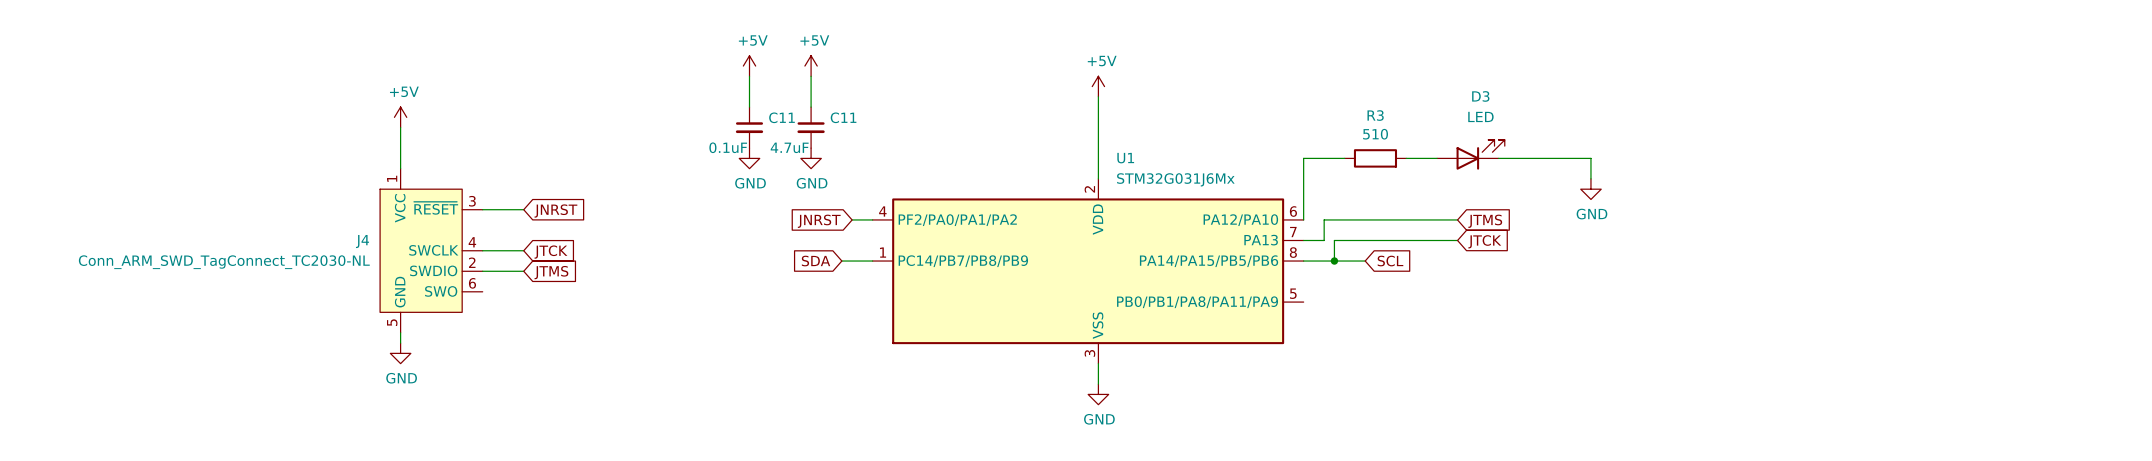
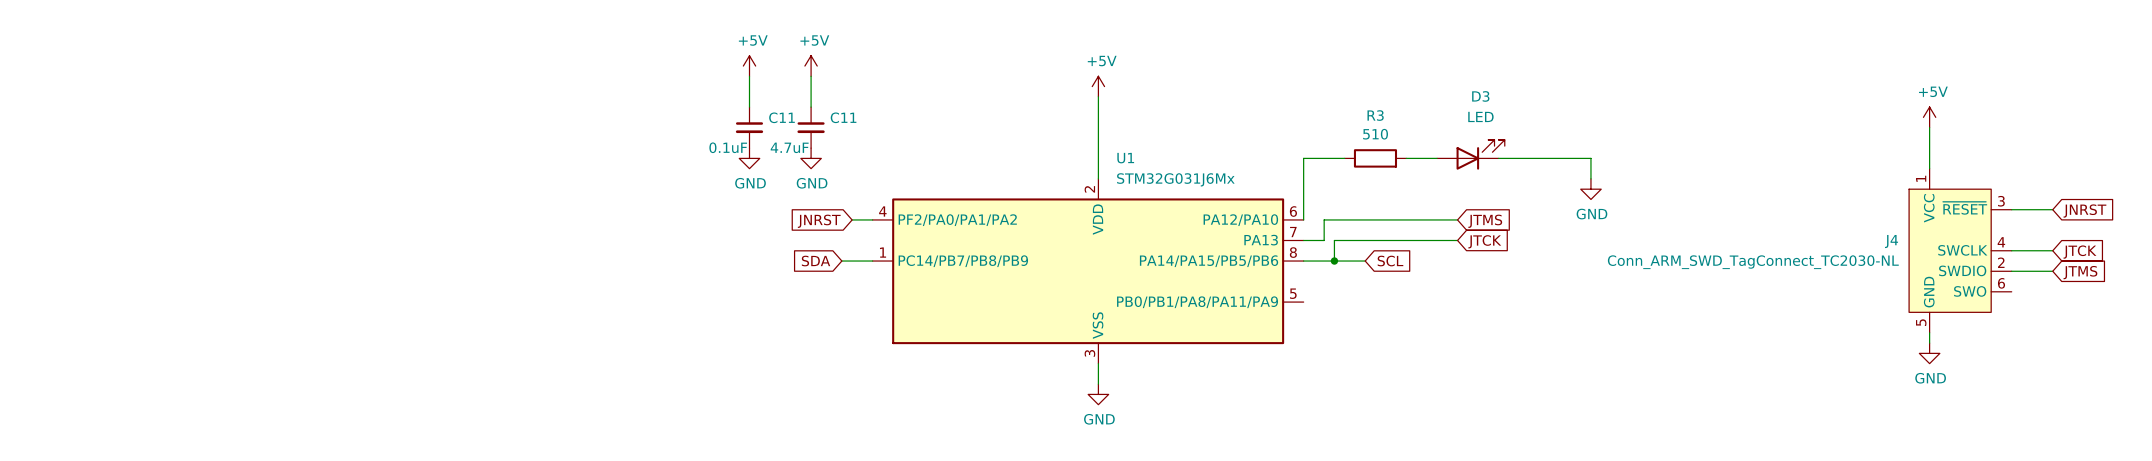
power symbol: +5V (400, 117) -> none
power symbol: none -> +5V (1929, 117)
wire: (400, 127) (400, 168) -> none
wire: none -> (1929, 127) (1929, 168)
wire: (482, 209) (523, 209) -> none
wire: none -> (2011, 209) (2052, 209)
global label: JNRST (555, 211) -> none
global label: none -> JNRST (2084, 211)
J4 position: (431, 250) -> (1960, 250)
wire: (482, 250) (523, 250) -> none
wire: none -> (2011, 250) (2052, 250)
global label: JTCK (550, 252) -> none
global label: none -> JTCK (2079, 252)
wire: (482, 271) (523, 271) -> none
wire: none -> (2011, 271) (2052, 271)
global label: JTMS (551, 272) -> none
global label: none -> JTMS (2080, 272)
wire: (400, 332) (400, 343) -> none
wire: none -> (1929, 332) (1929, 343)
power symbol: GND (400, 353) -> none
power symbol: none -> GND (1929, 353)

